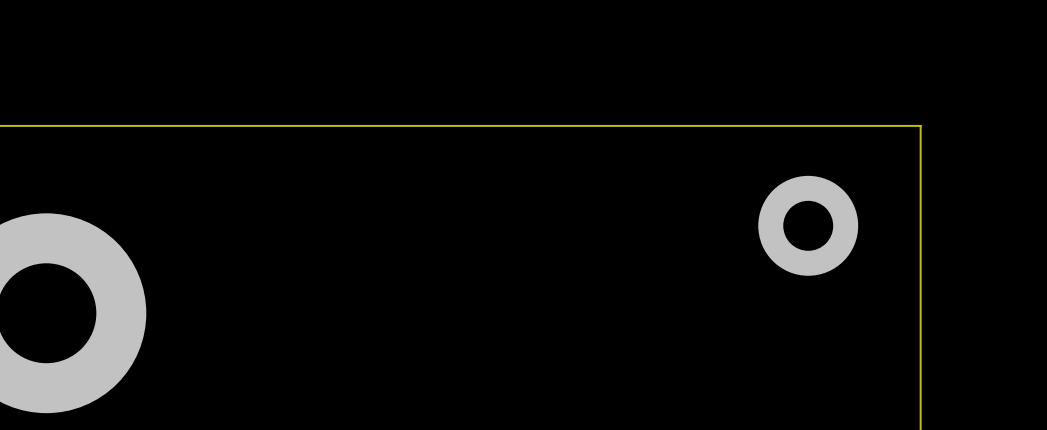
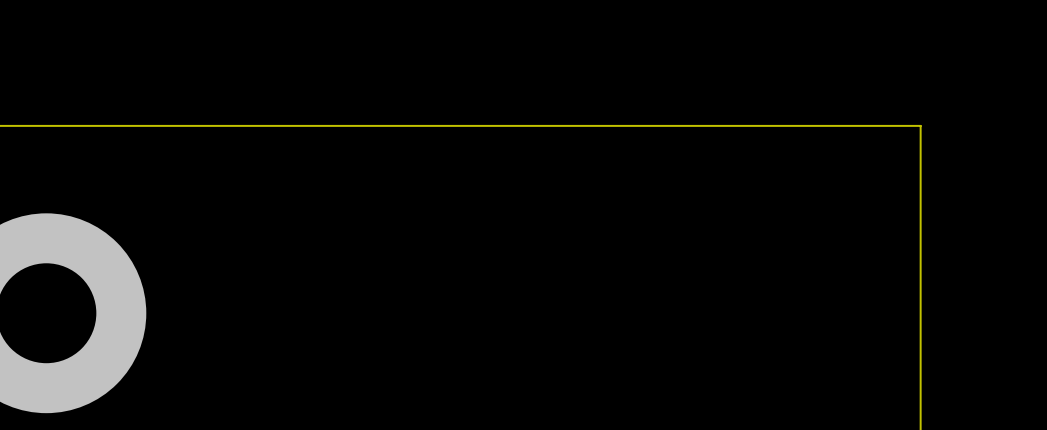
via: (808, 225) -> none

